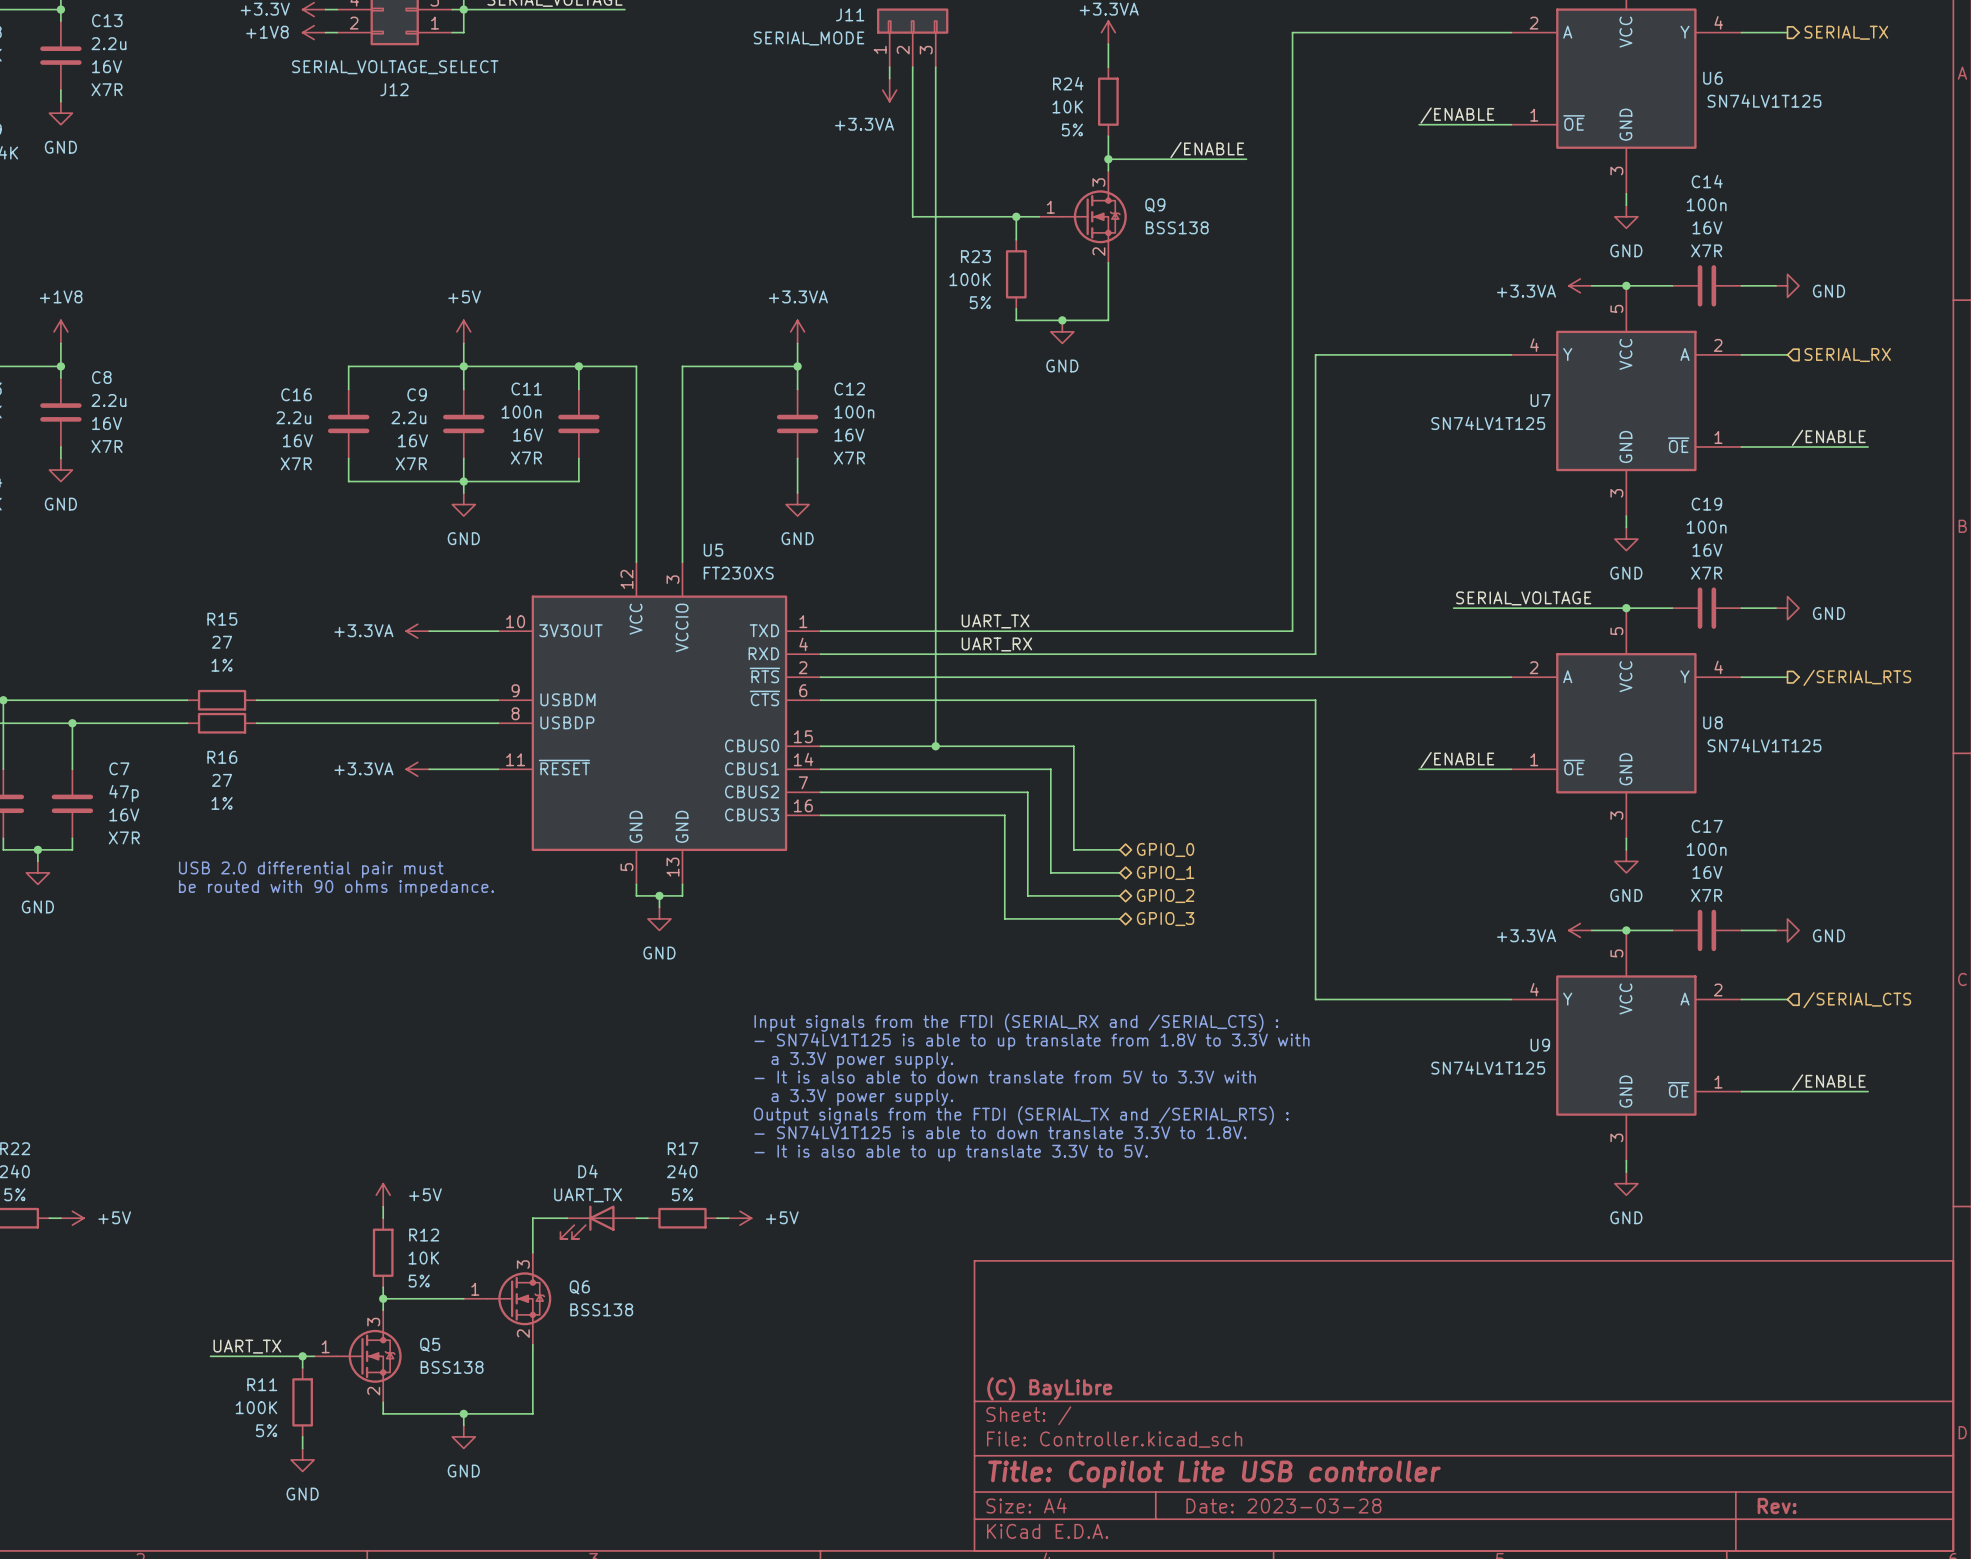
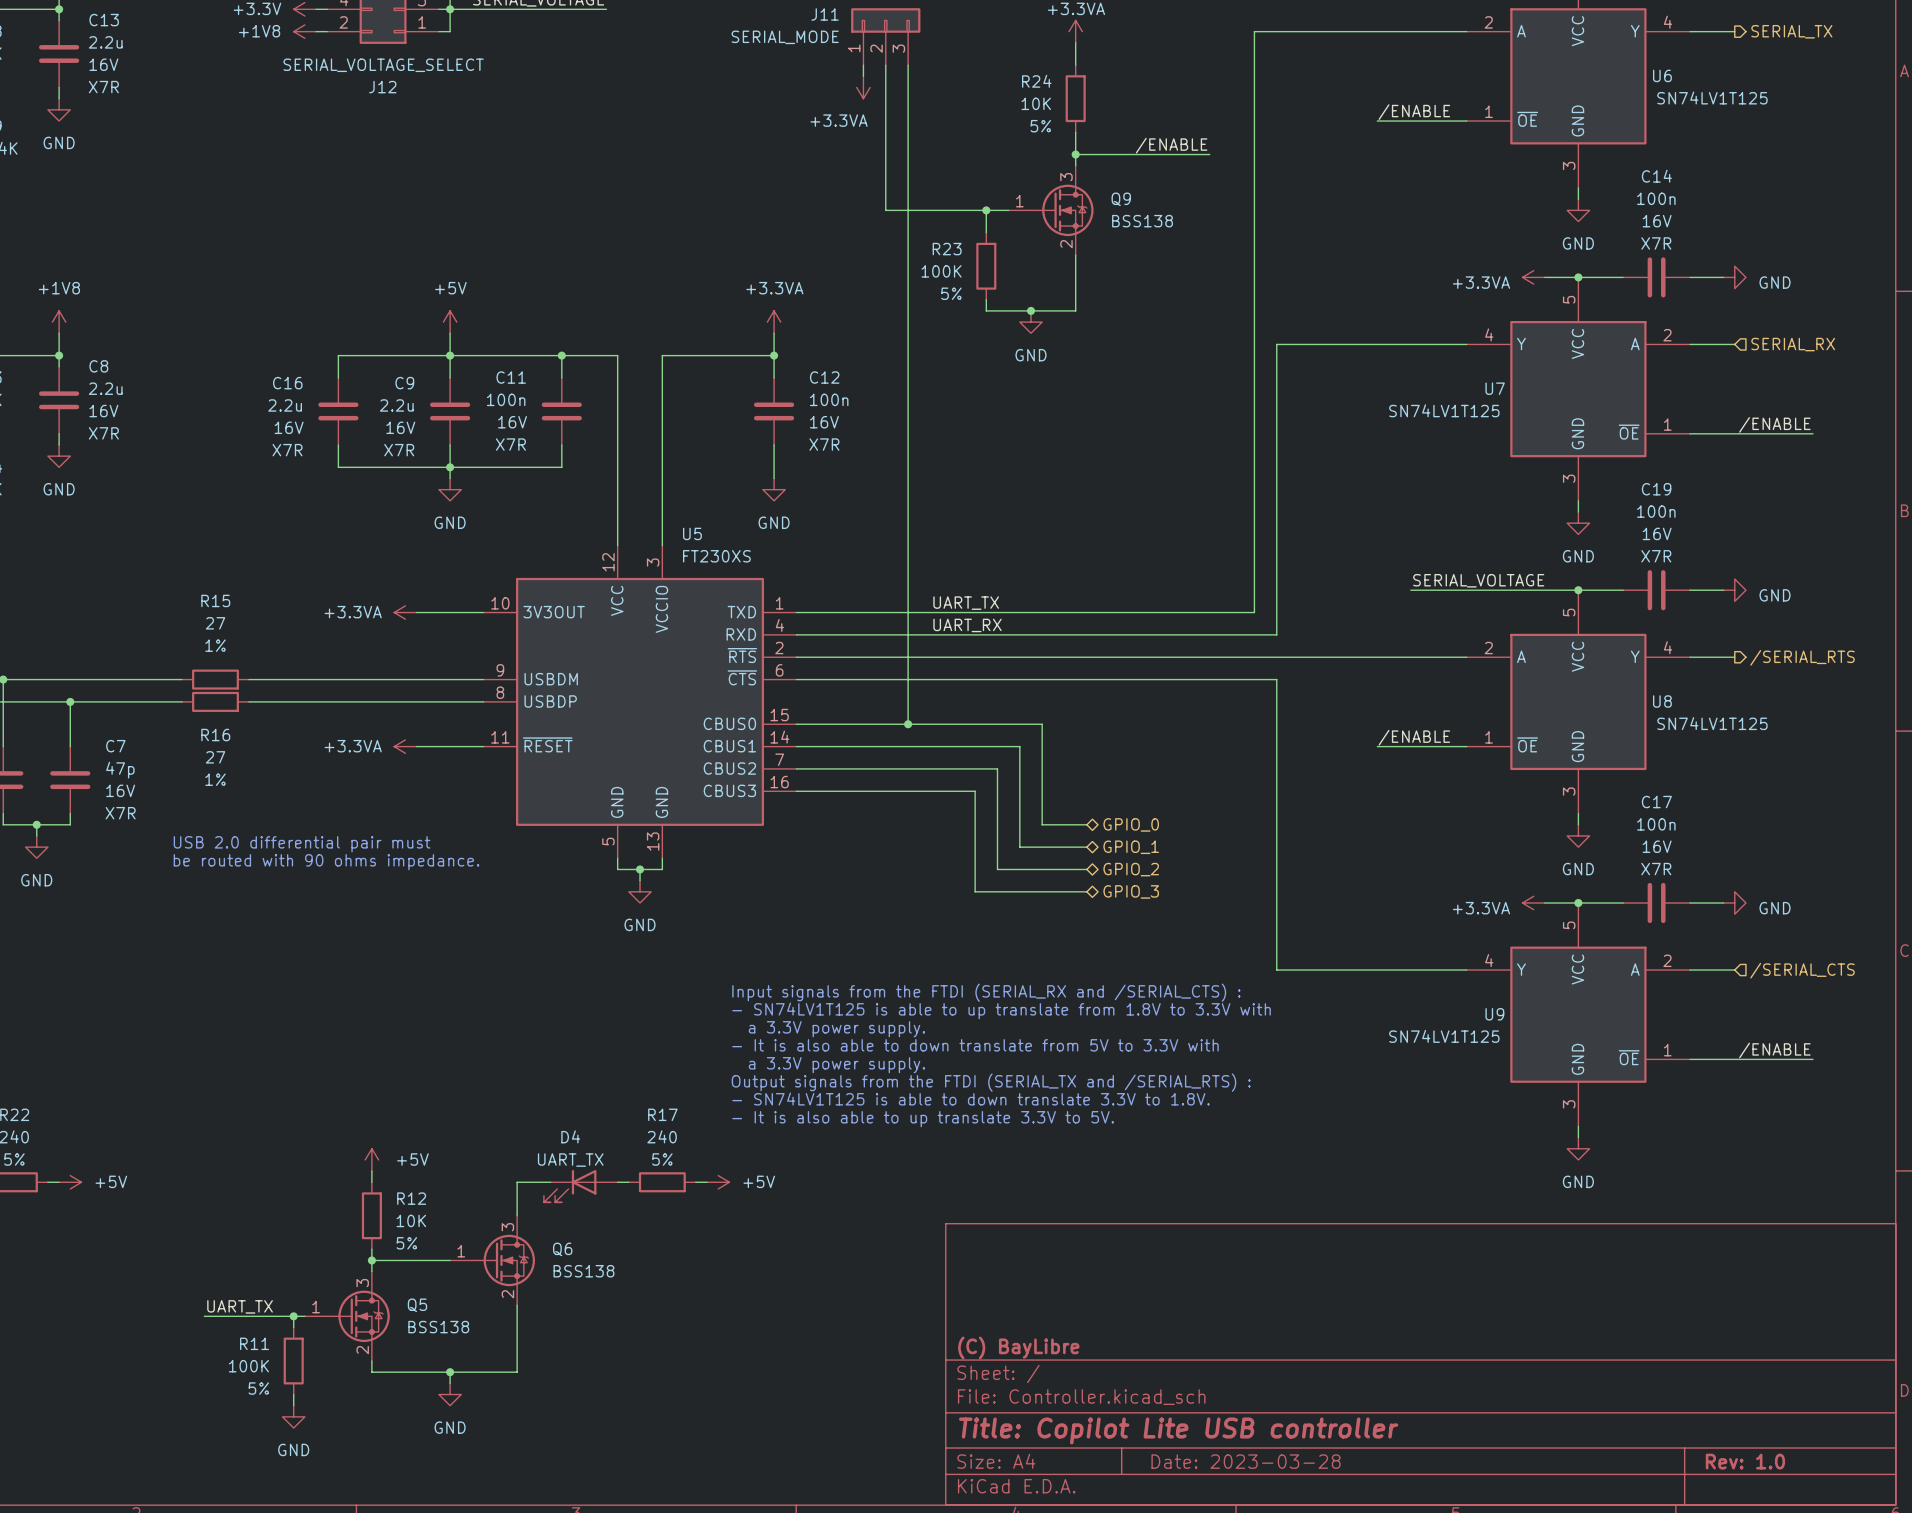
title block: Rev: (1777, 1506) -> Rev: 1.0 (1745, 1461)

